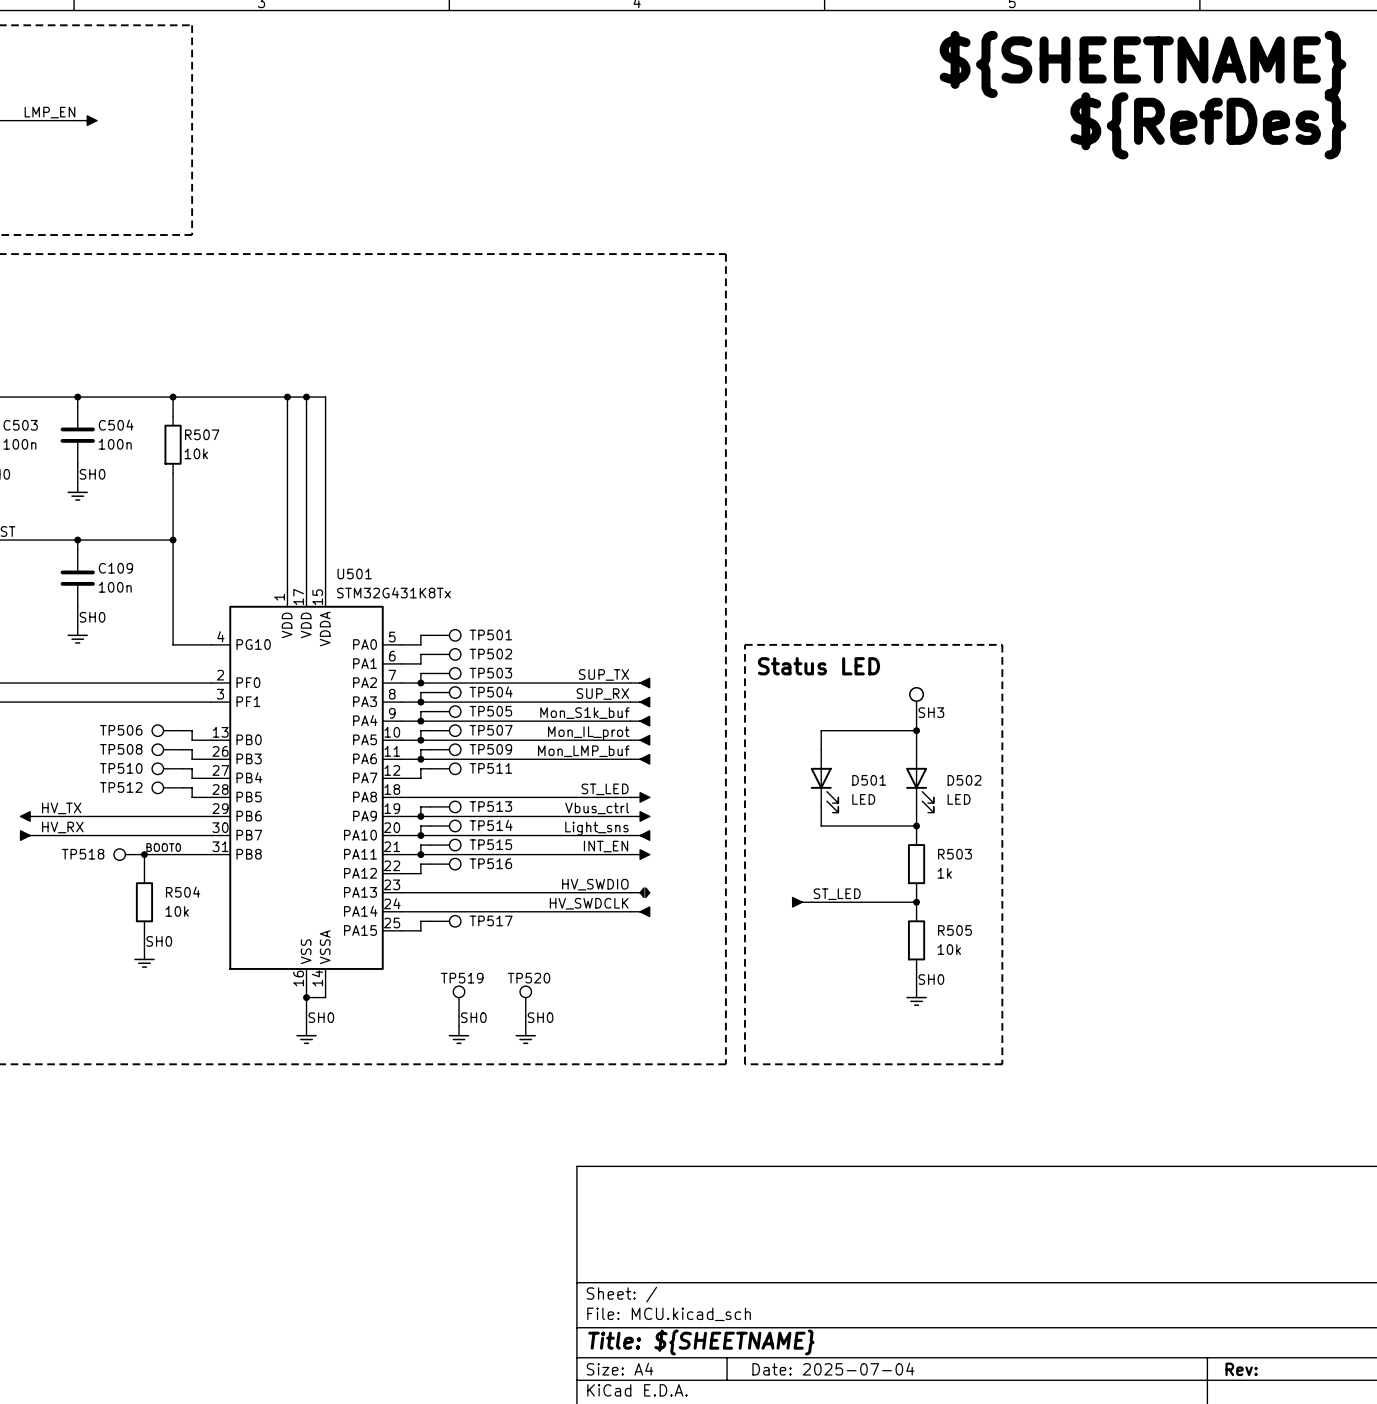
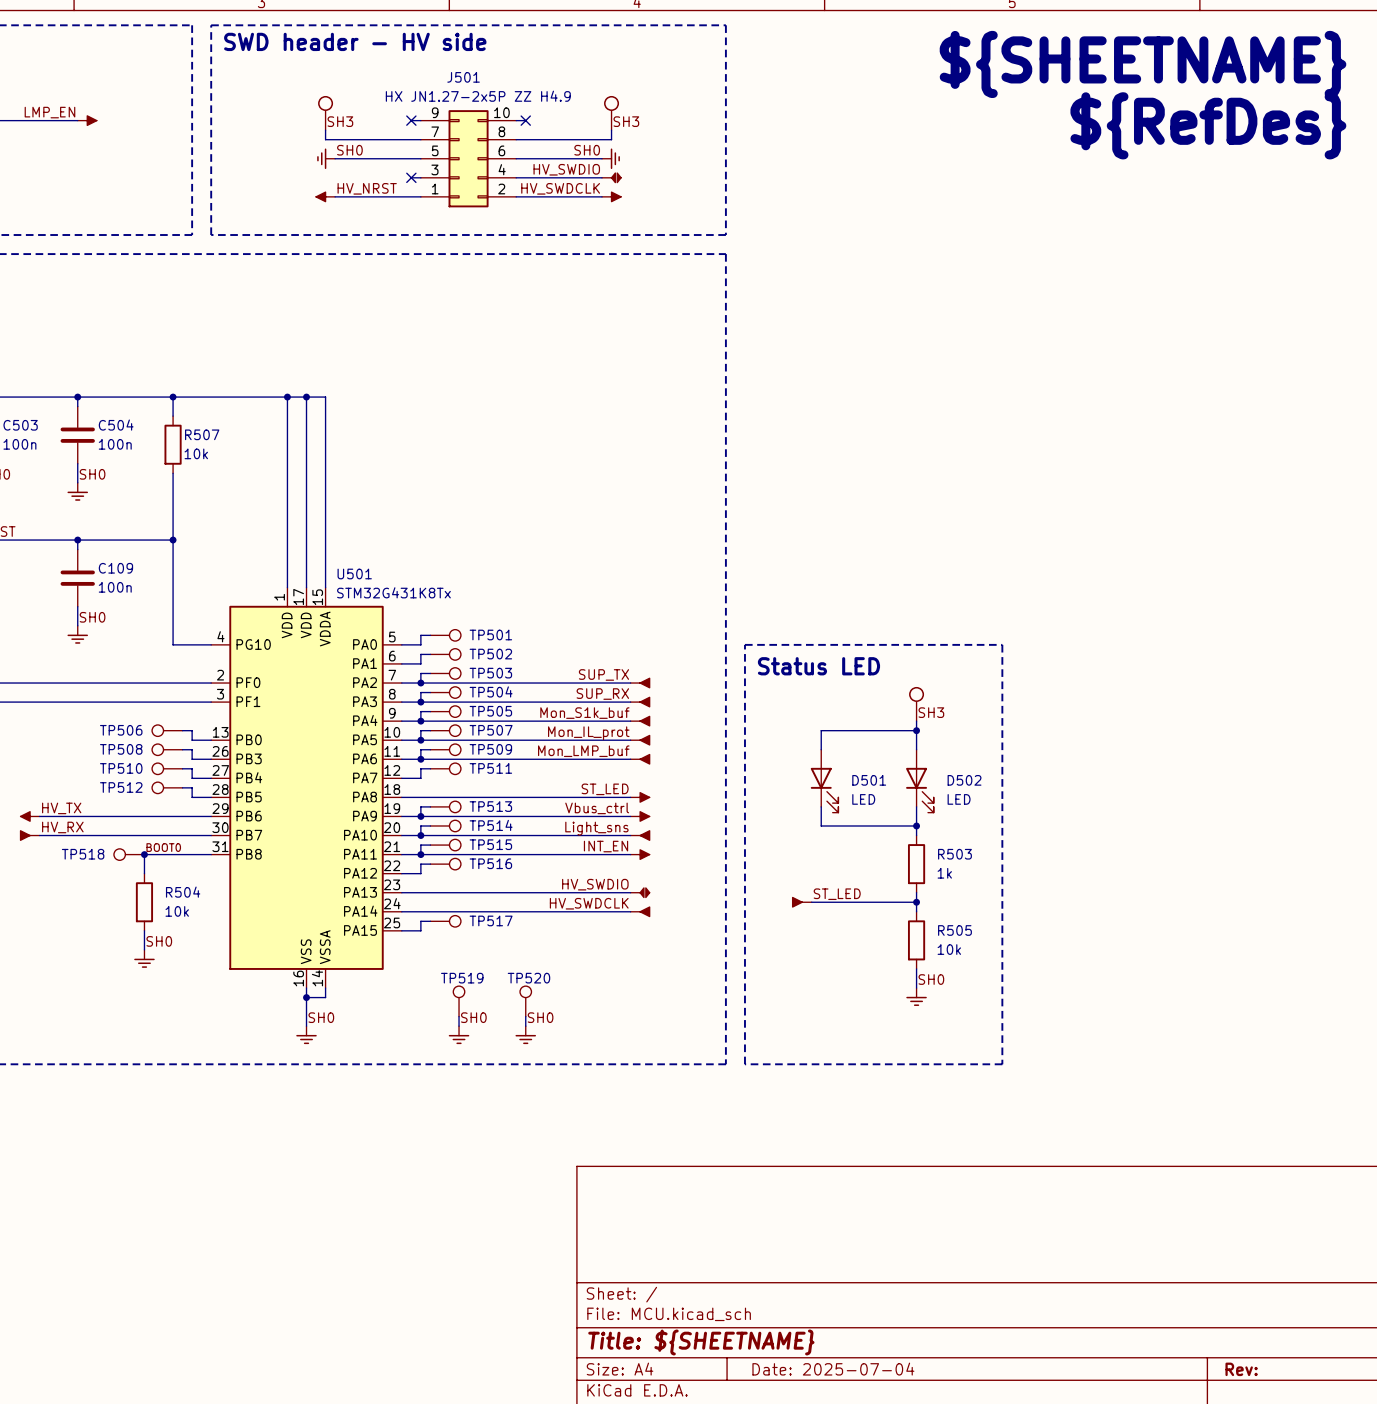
line: none -> (211, 25) (725, 25) (725, 235) (211, 235) (211, 25)
text: none -> SWD header - HV side (355, 41)
part: none -> (325, 113)
part: none -> (611, 113)
wire: none -> (411, 120) (420, 120)
no-connect mark: none -> (411, 120)
wire: none -> (516, 120) (525, 120)
no-connect mark: none -> (525, 120)
label: none -> SH3 (340, 121)
label: none -> SH3 (626, 121)
wire: none -> (325, 130) (325, 139) (420, 139)
wire: none -> (611, 130) (611, 139) (516, 139)
label: none -> SH0 (349, 150)
label: none -> SH0 (587, 150)
part: none -> (326, 158)
wire: none -> (335, 158) (420, 158)
J501: none -> HX JN1.27-2x5P ZZ H4.9 (468, 158)
wire: none -> (516, 158) (602, 158)
part: none -> (610, 158)
label: none -> HV_SWDIO (566, 169)
wire: none -> (411, 177) (420, 177)
no-connect mark: none -> (411, 177)
wire: none -> (516, 177) (602, 177)
part: none -> (611, 177)
label: none -> HV_NRST (367, 188)
label: none -> HV_SWDCLK (560, 188)
part: none -> (325, 196)
wire: none -> (335, 196) (420, 196)
wire: none -> (516, 196) (602, 196)
part: none -> (611, 196)

